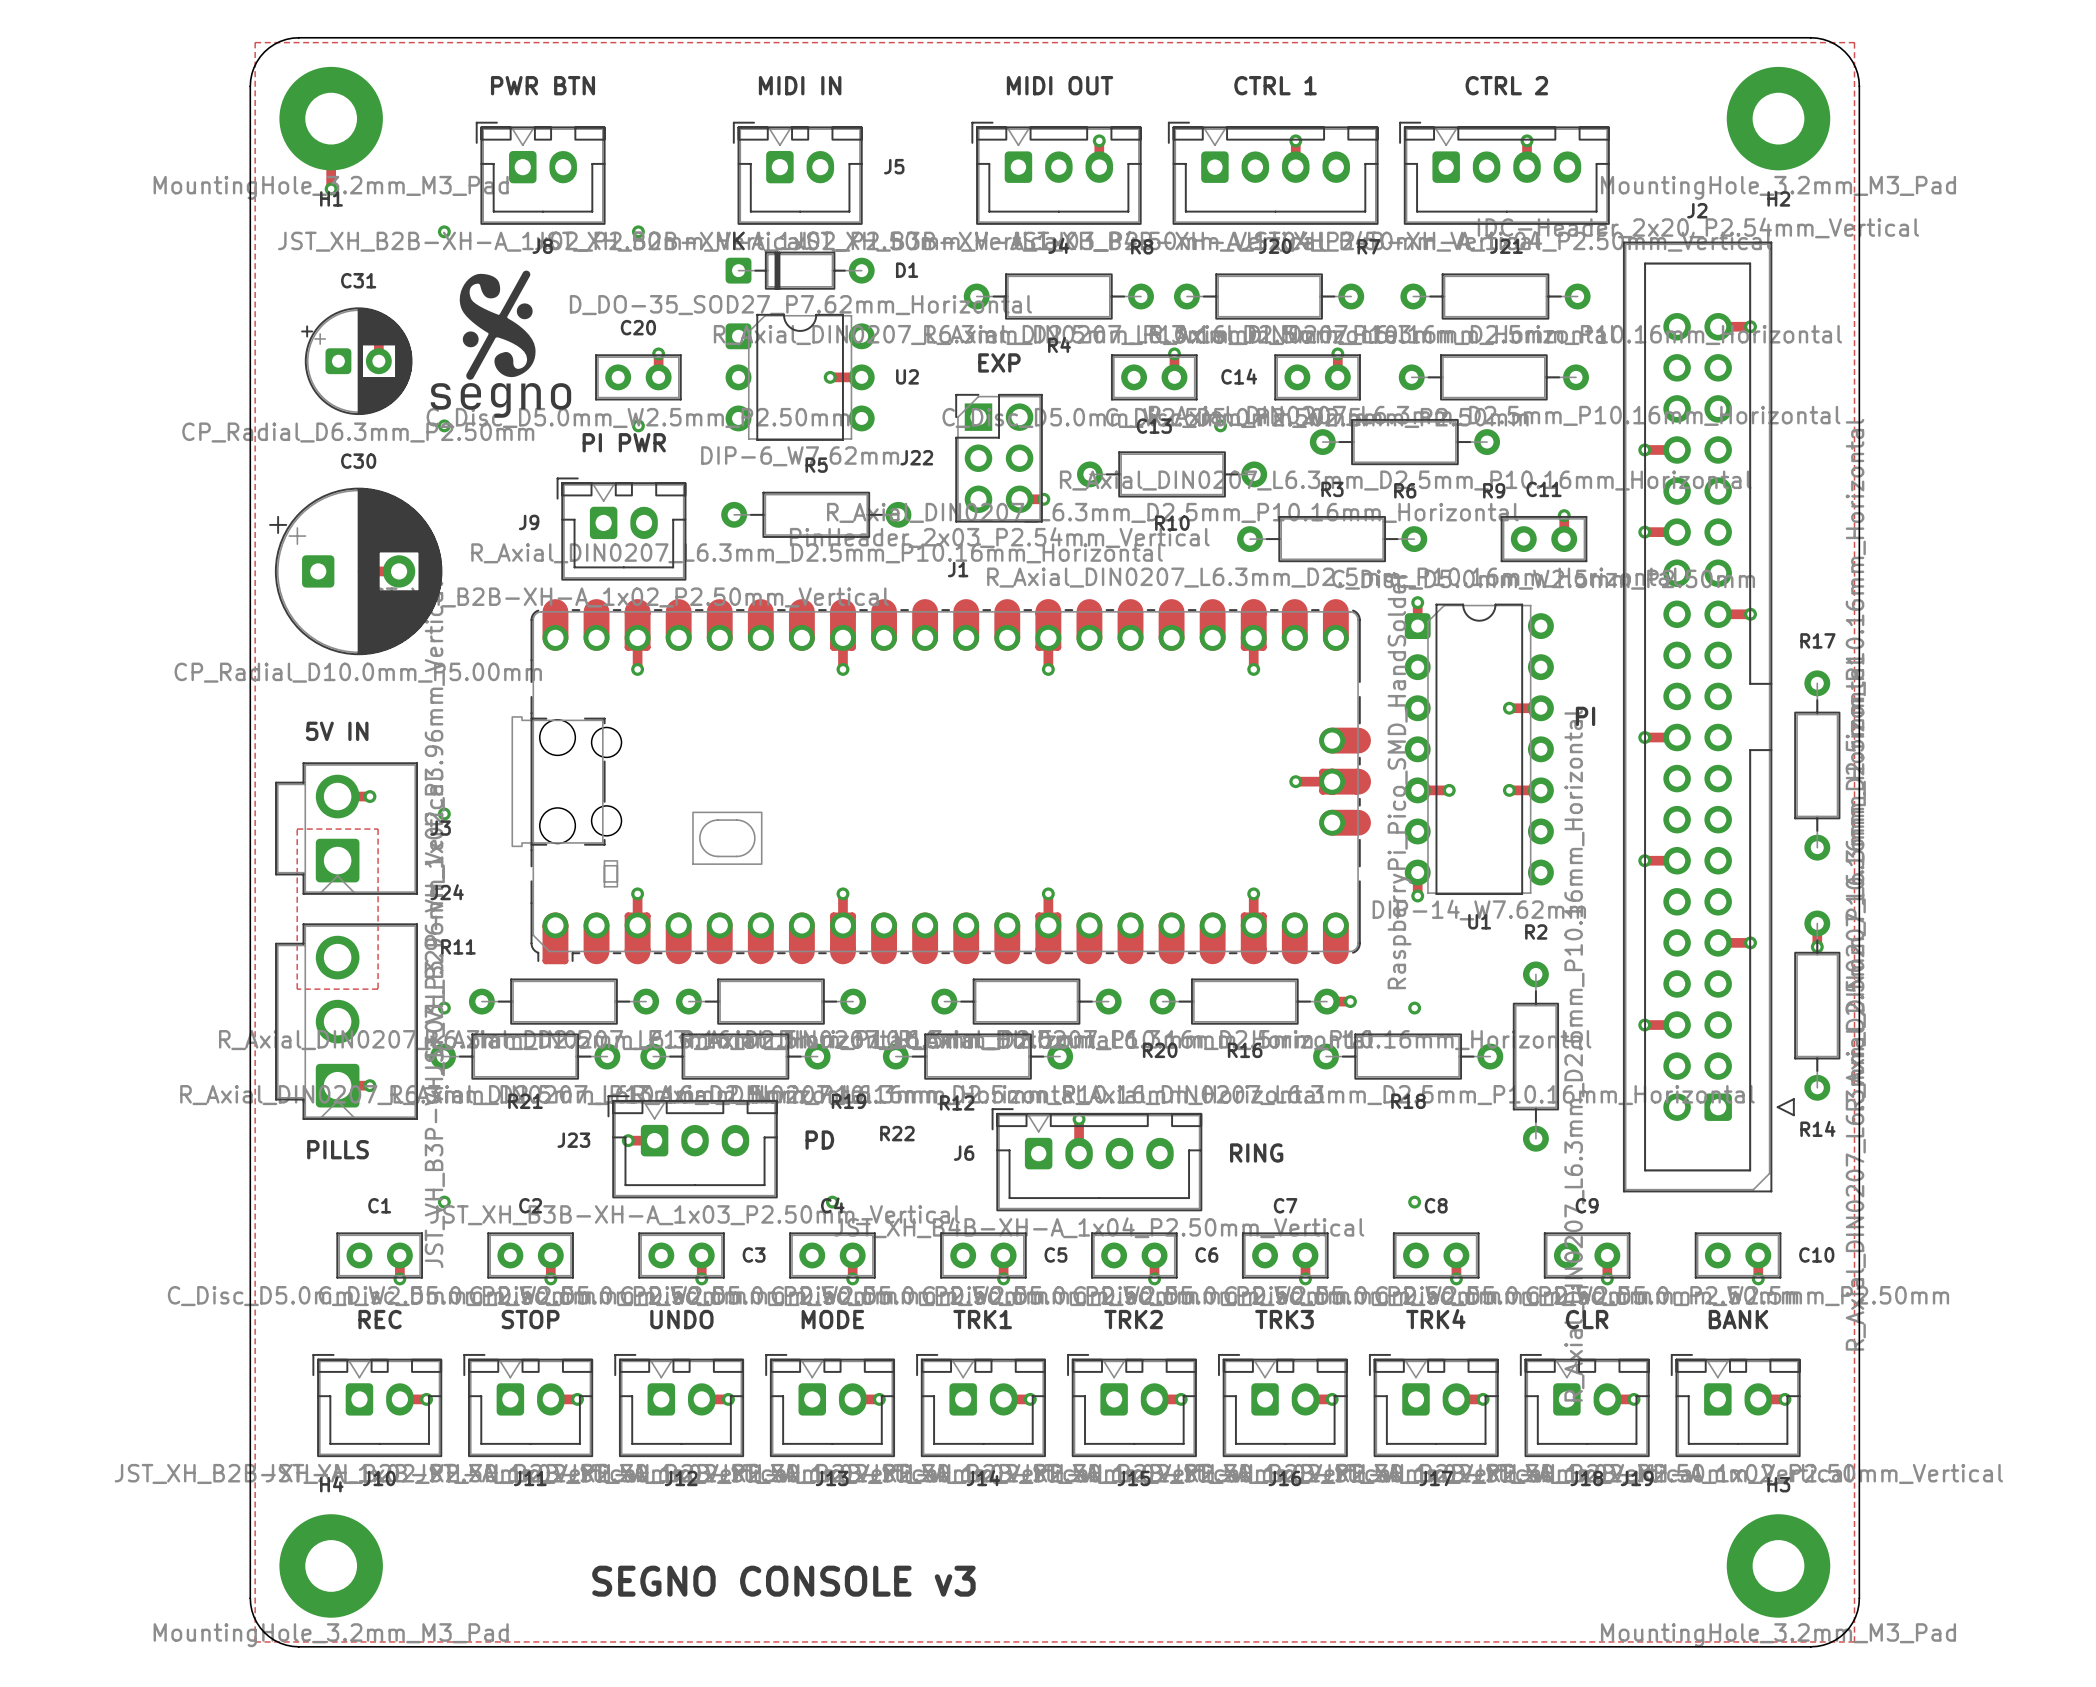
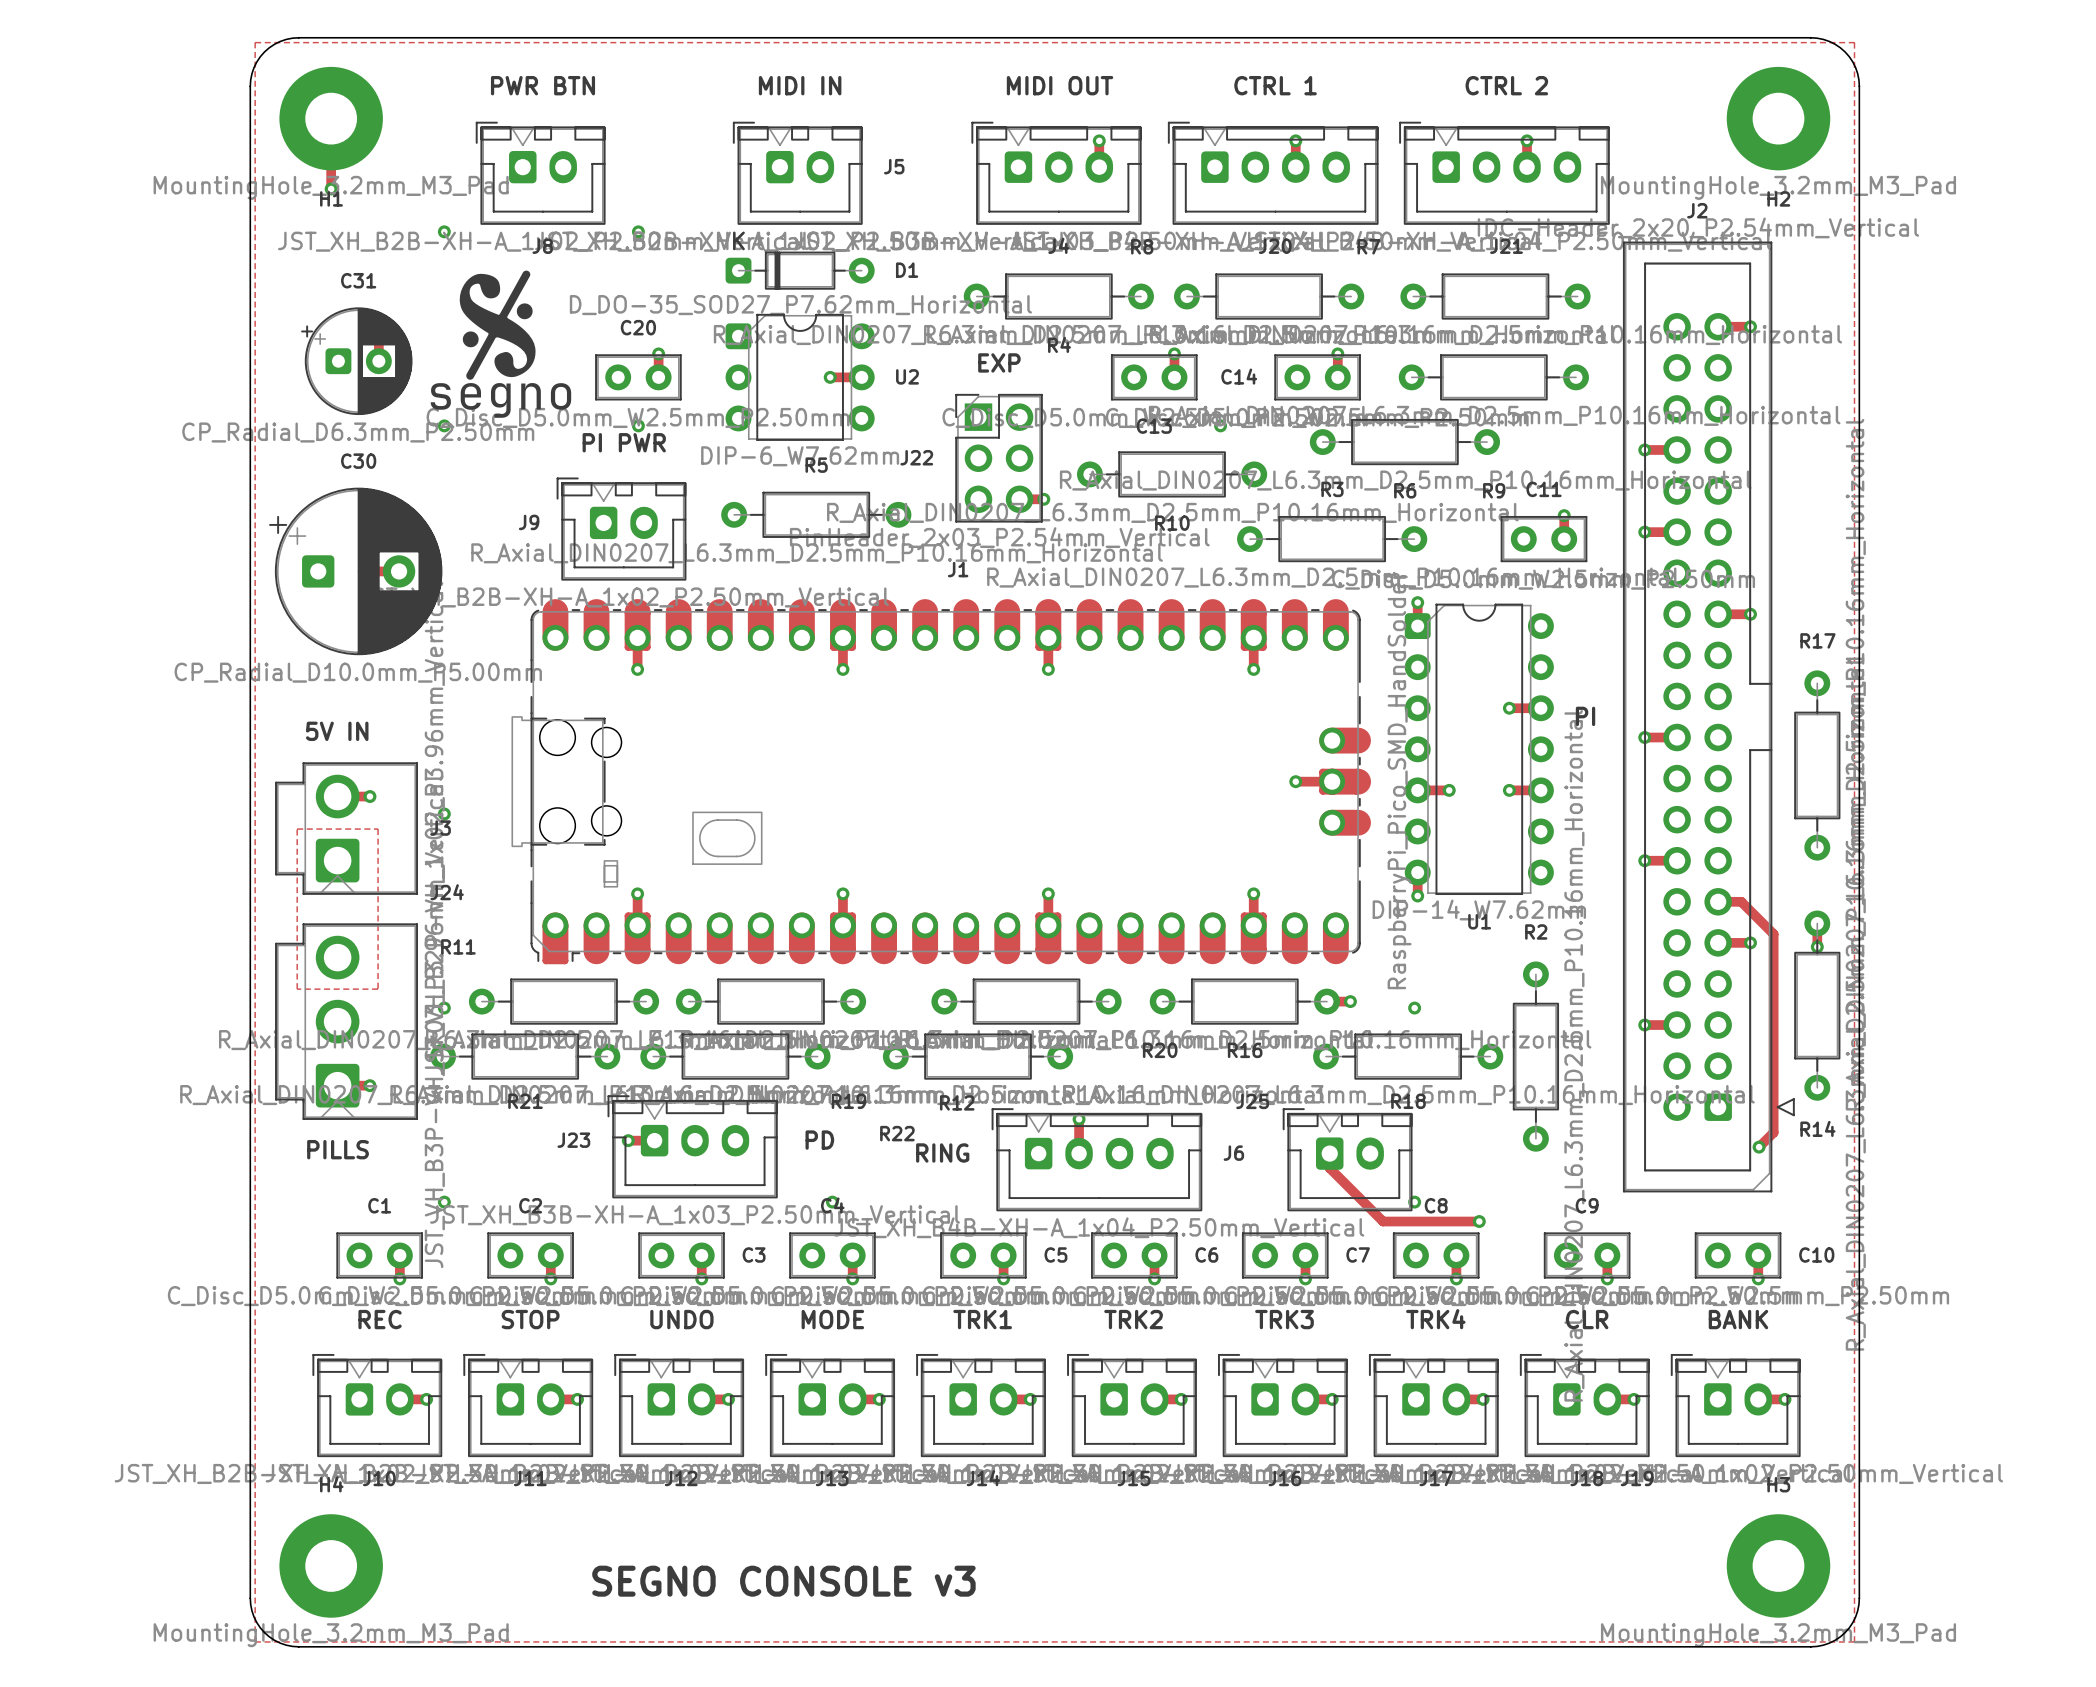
track: none -> (1718, 901) (1741, 901) (1773, 934) (1773, 1132) (1759, 1147)
via: none -> (1759, 1147)
text position: RING (1256, 1152) -> RING (942, 1152)
J6 name position: J6 (964, 1153) -> J6 (1233, 1153)
track: none -> (1329, 1153) (1329, 1168) (1383, 1221) (1479, 1221)
J25: none -> (1347, 1159)
C7 name position: C7 (1285, 1205) -> C7 (1358, 1254)
via: none -> (1479, 1221)

